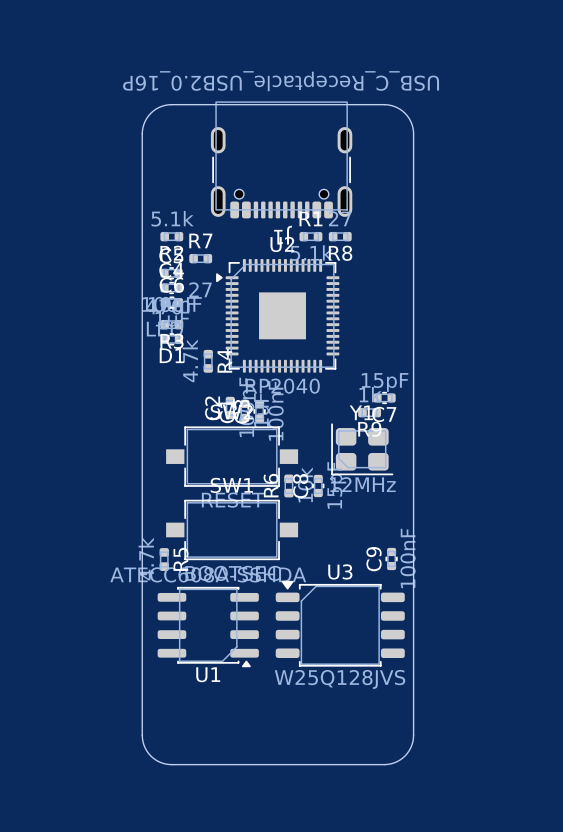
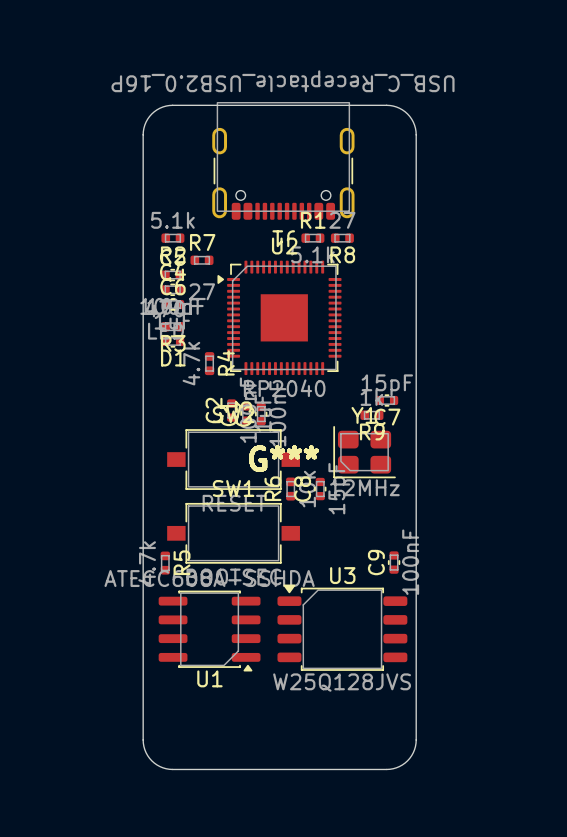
G***: none -> (283, 458)

